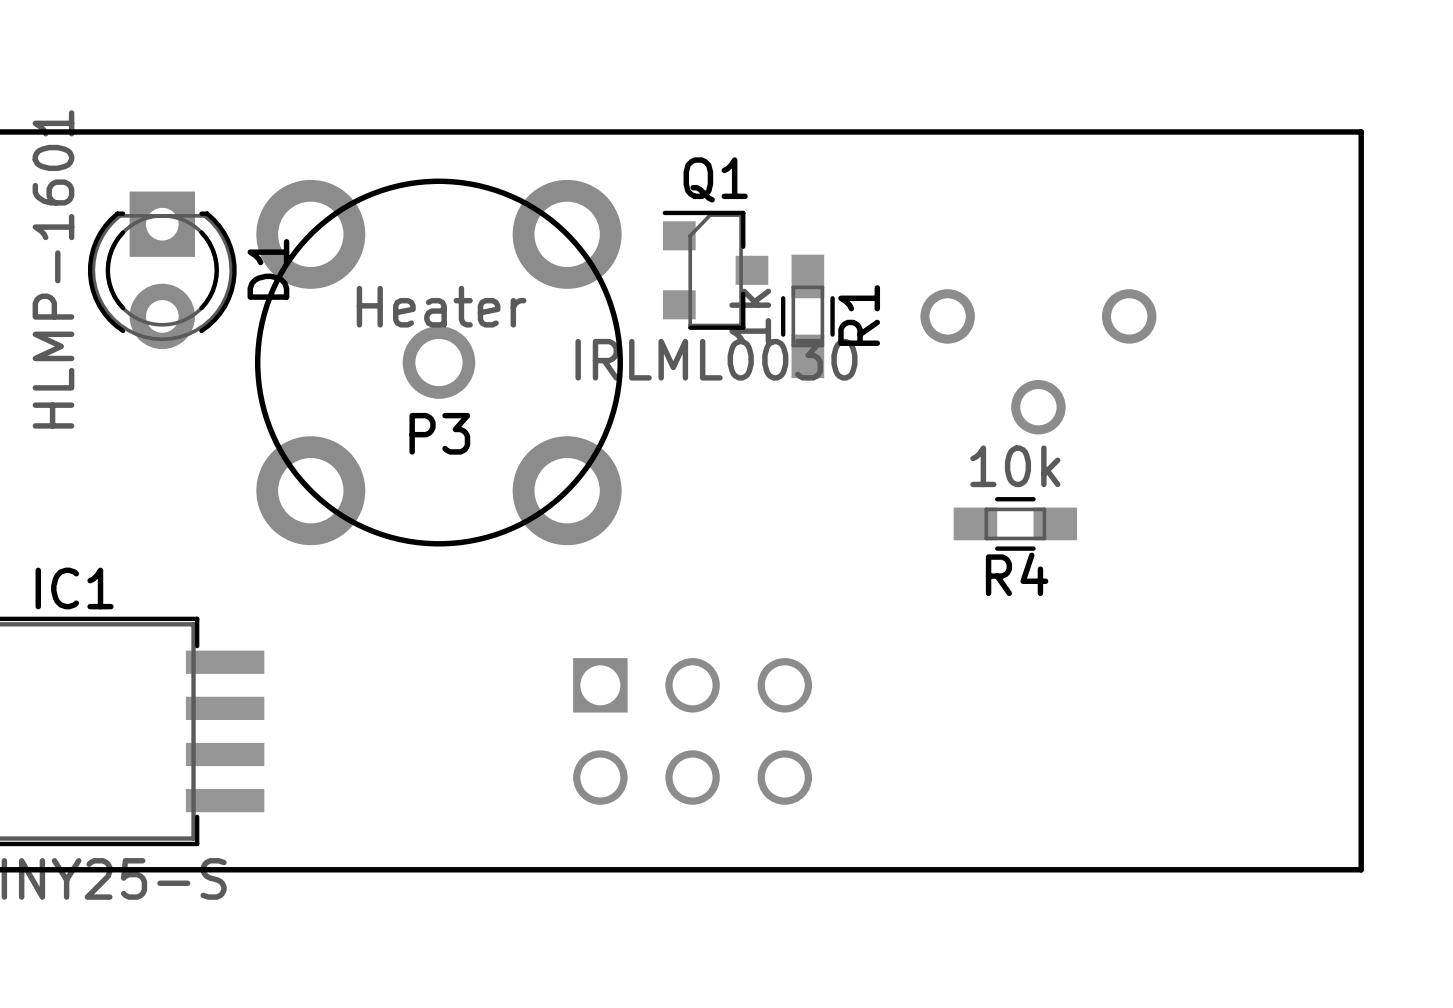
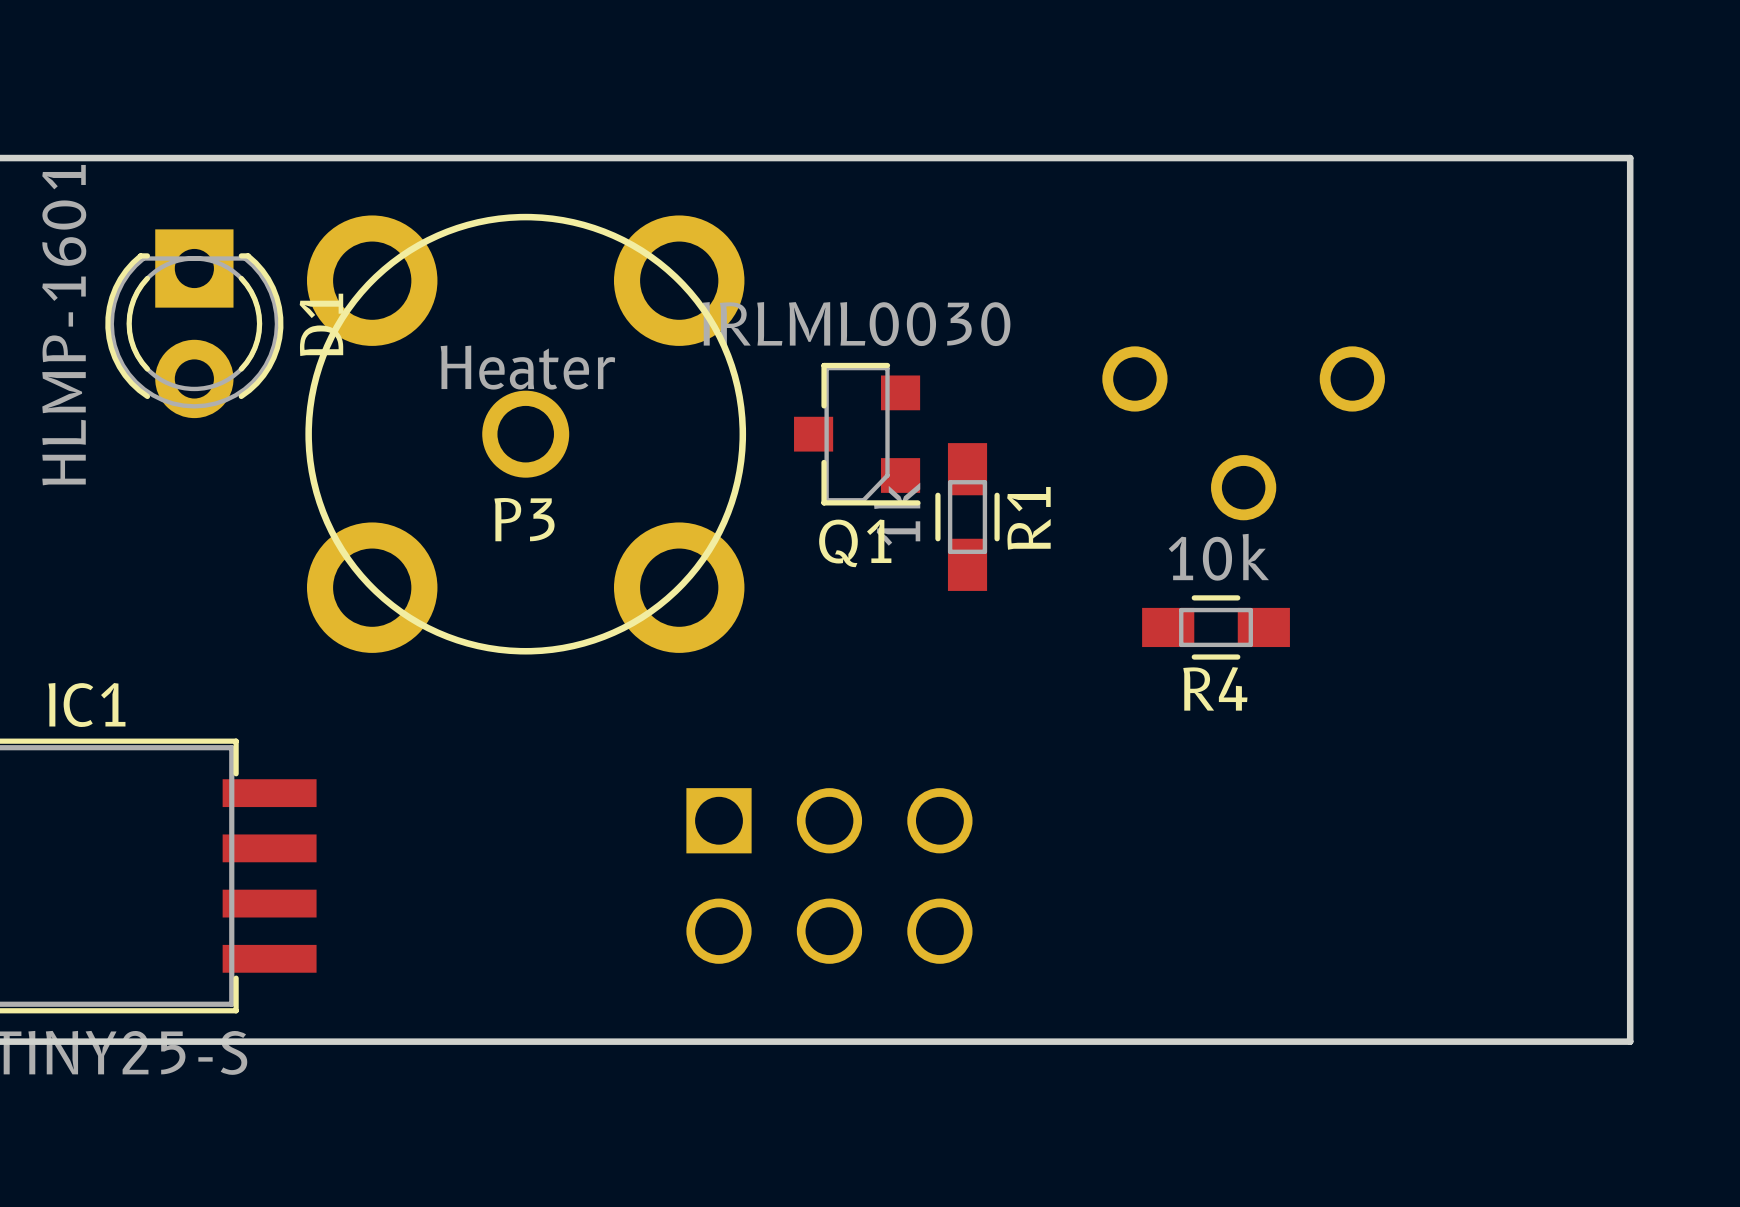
Q1 rotation: 0° (715, 270) -> 180° (857, 434)
Q1 position: (715, 270) -> (857, 434)
R1 position: (807, 316) -> (967, 517)

